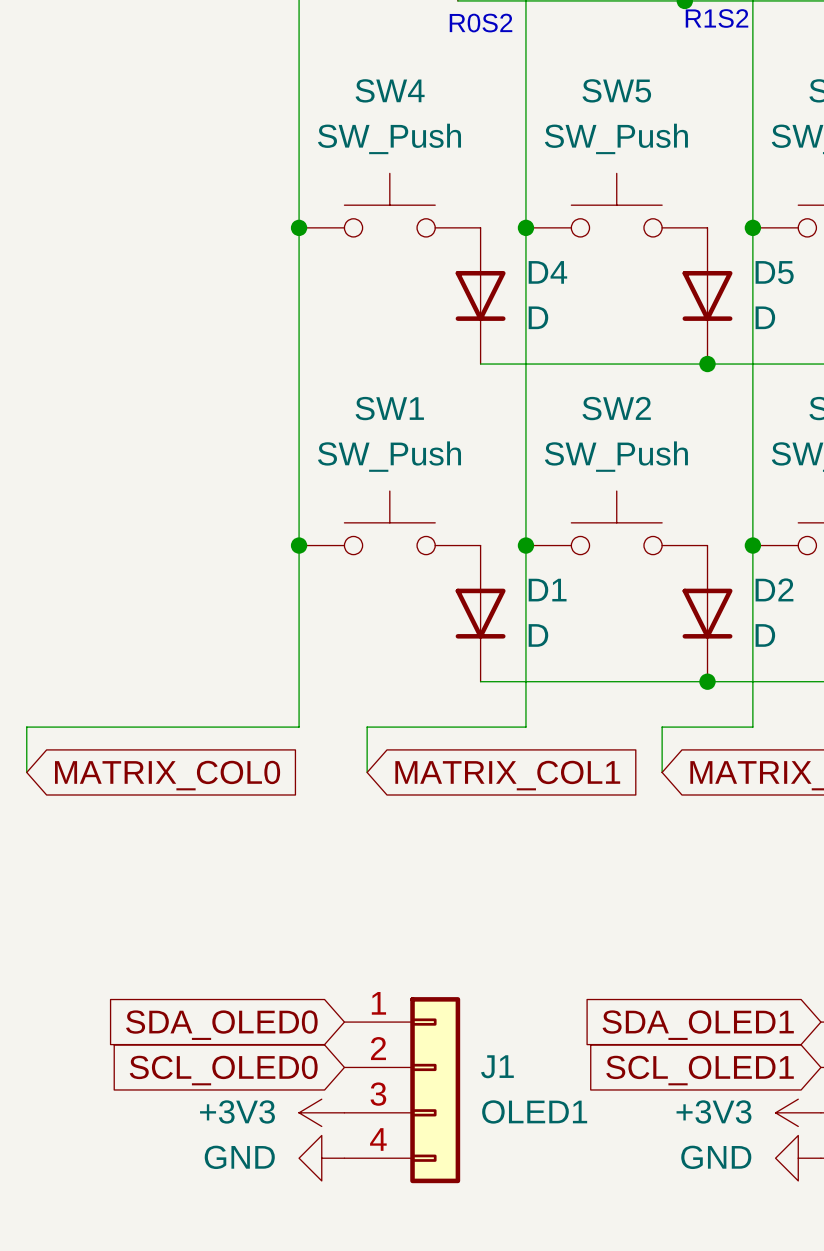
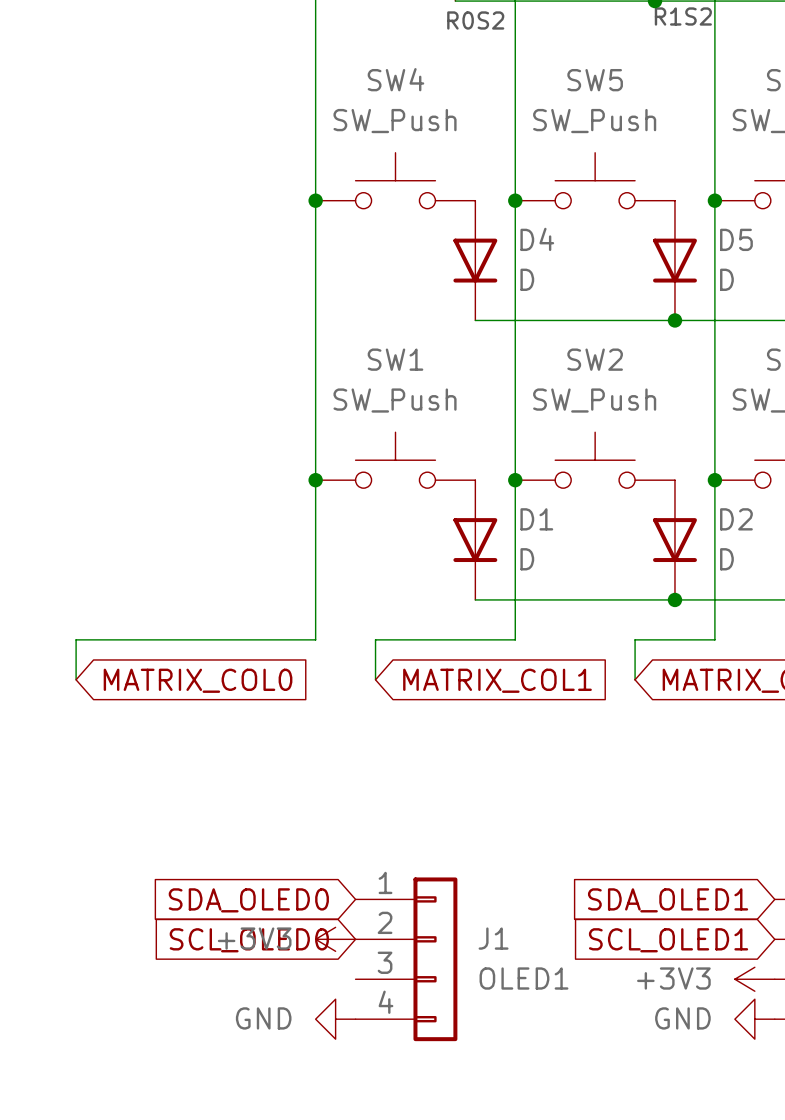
power symbol position: +3V3 (321, 1112) -> +3V3 (335, 939)

